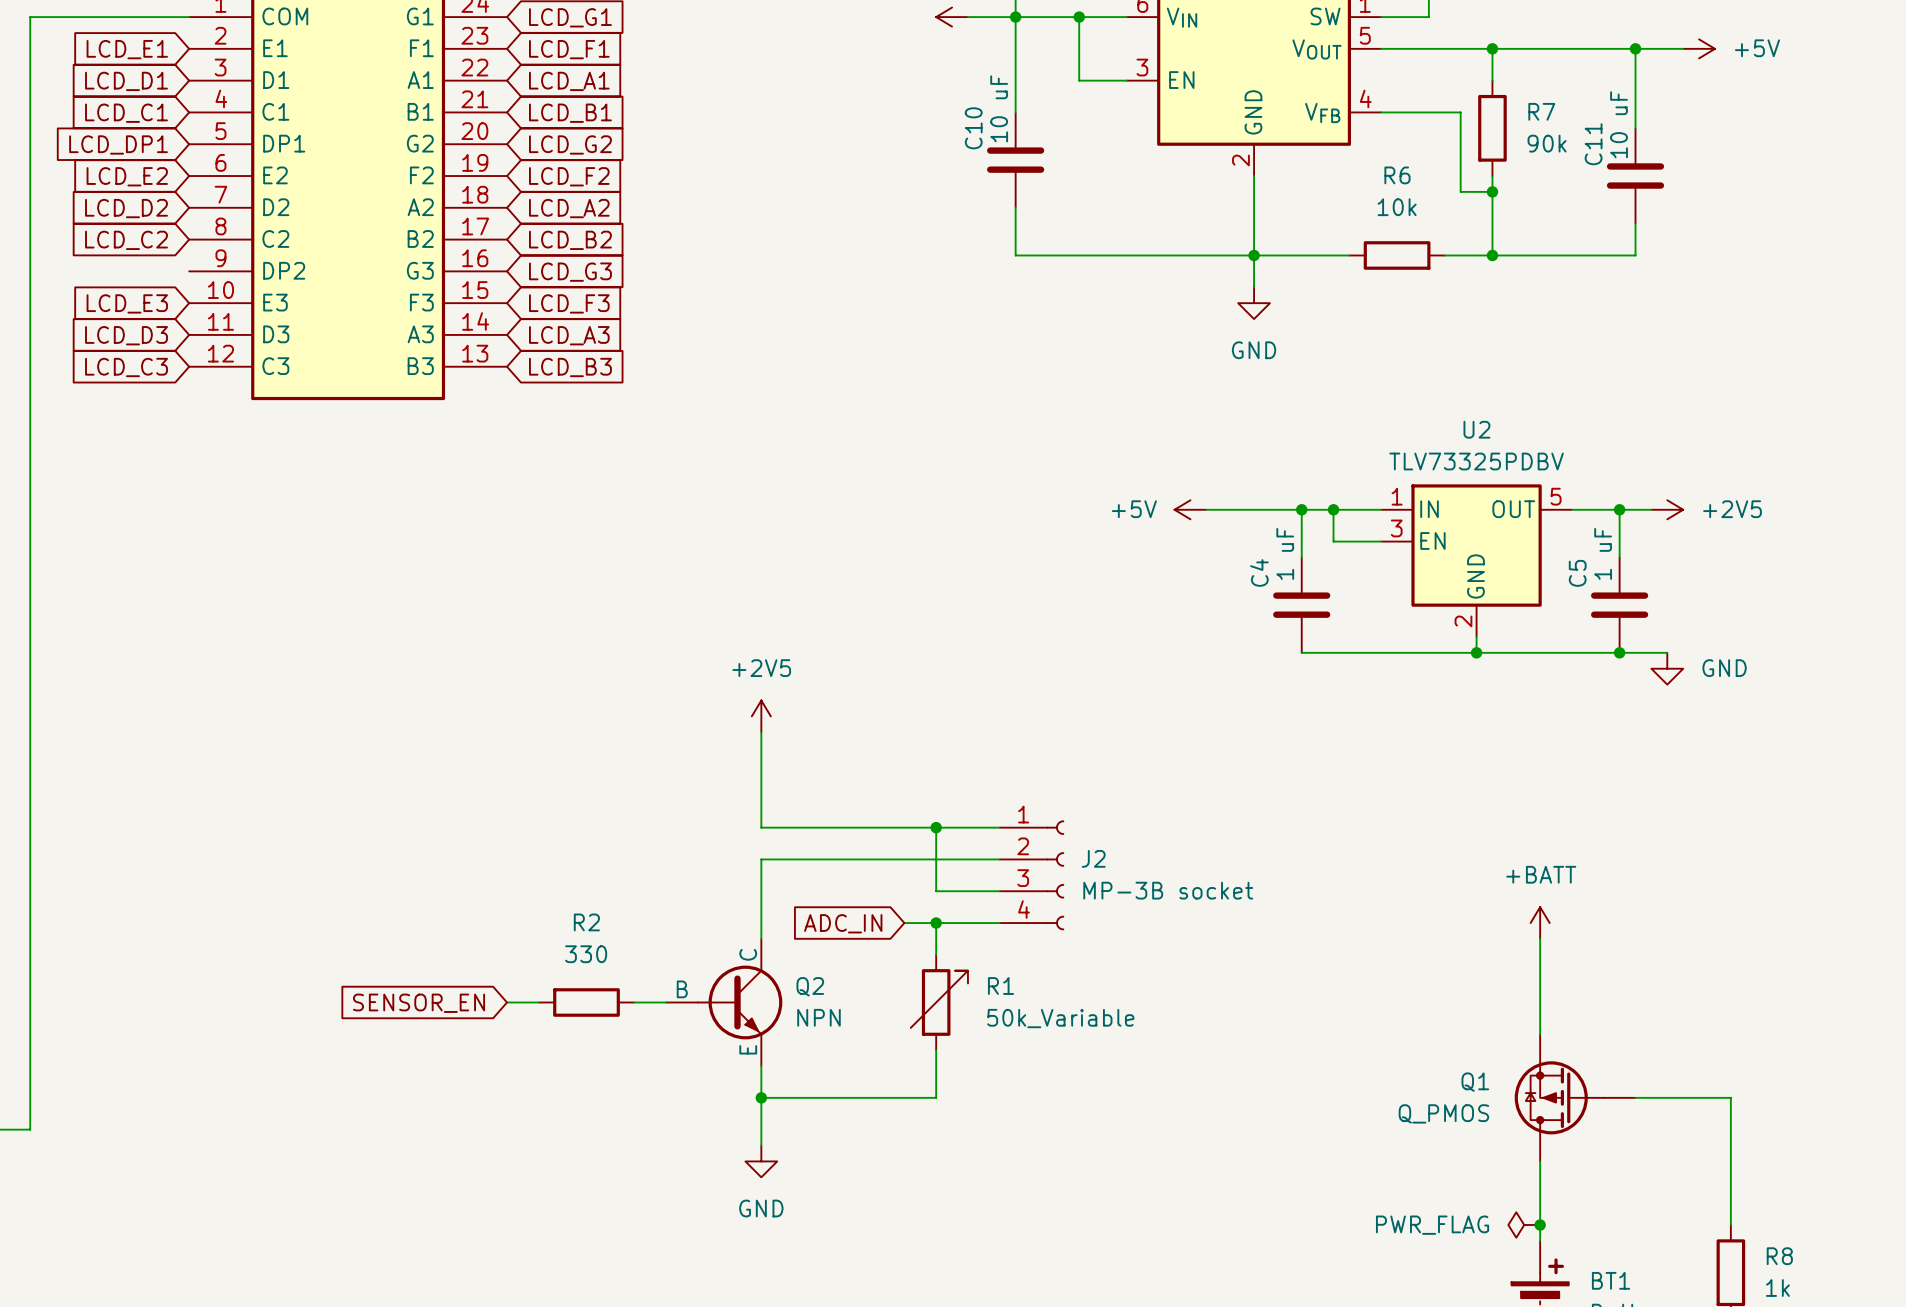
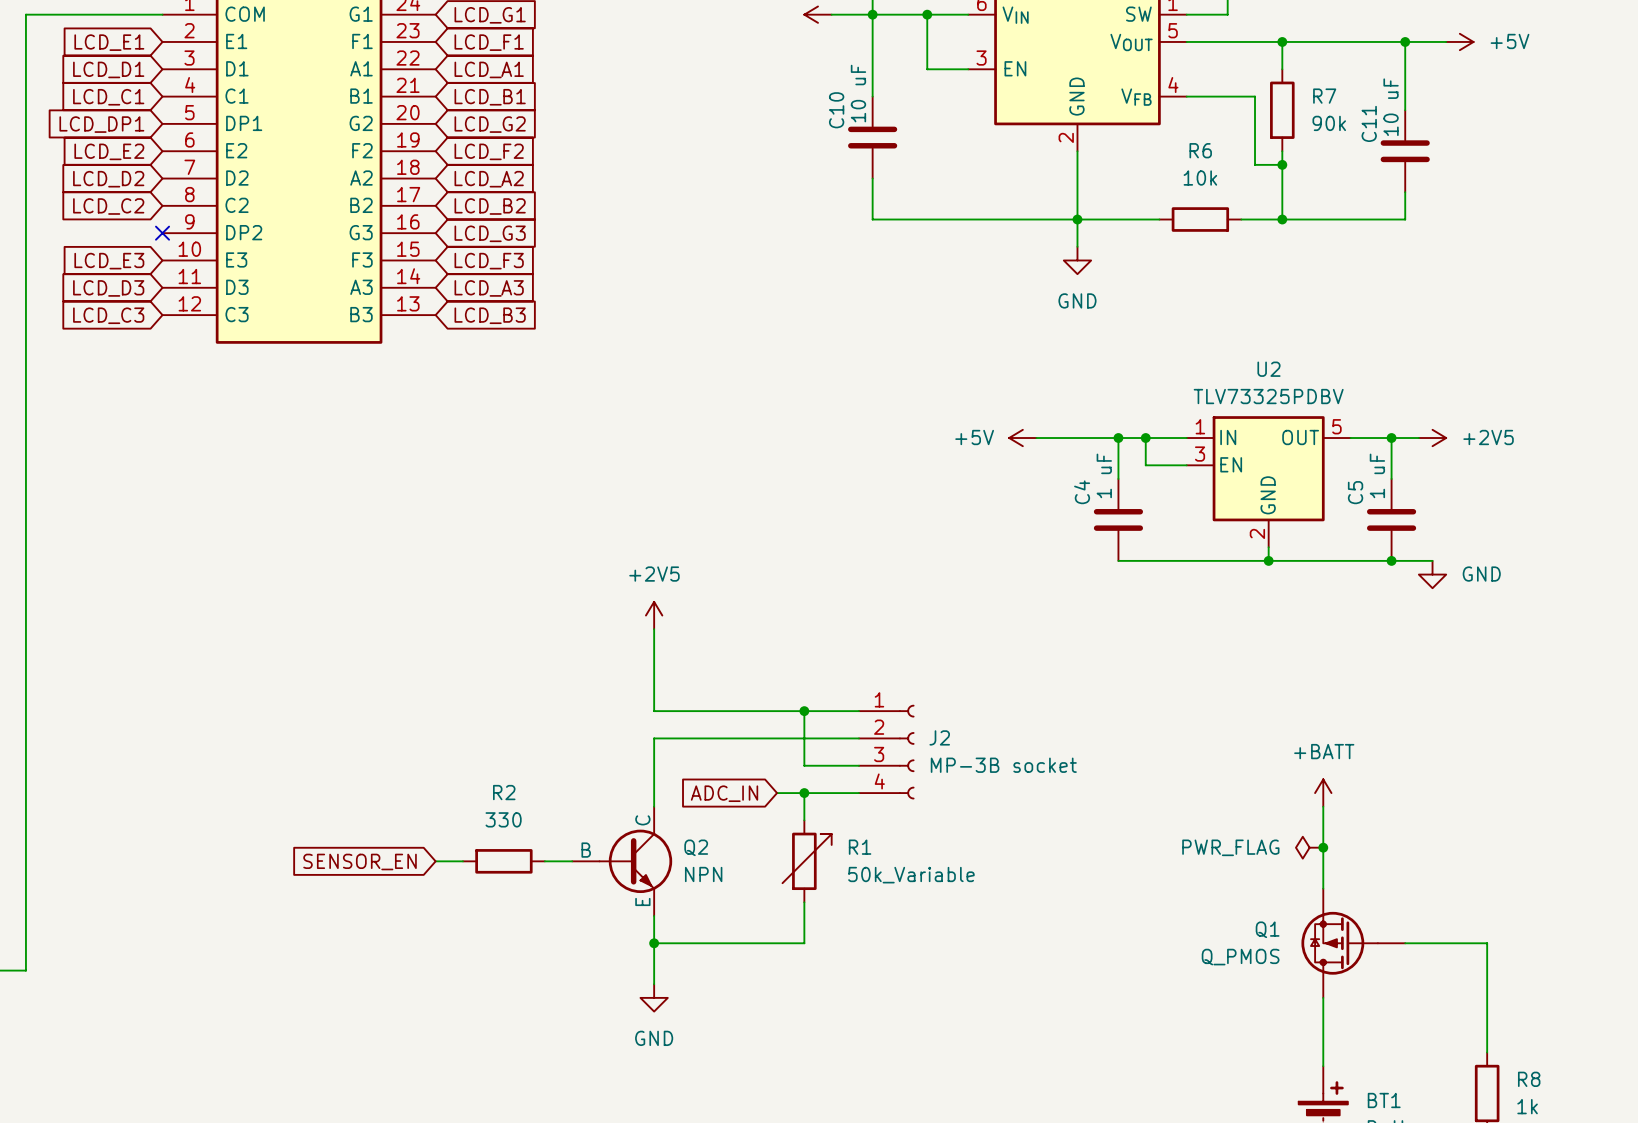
no-connect mark: none -> (162, 233)
junction: none -> (1323, 847)
power symbol position: PWR_FLAG (1524, 1225) -> PWR_FLAG (1309, 847)
junction: (1540, 1225) -> none

